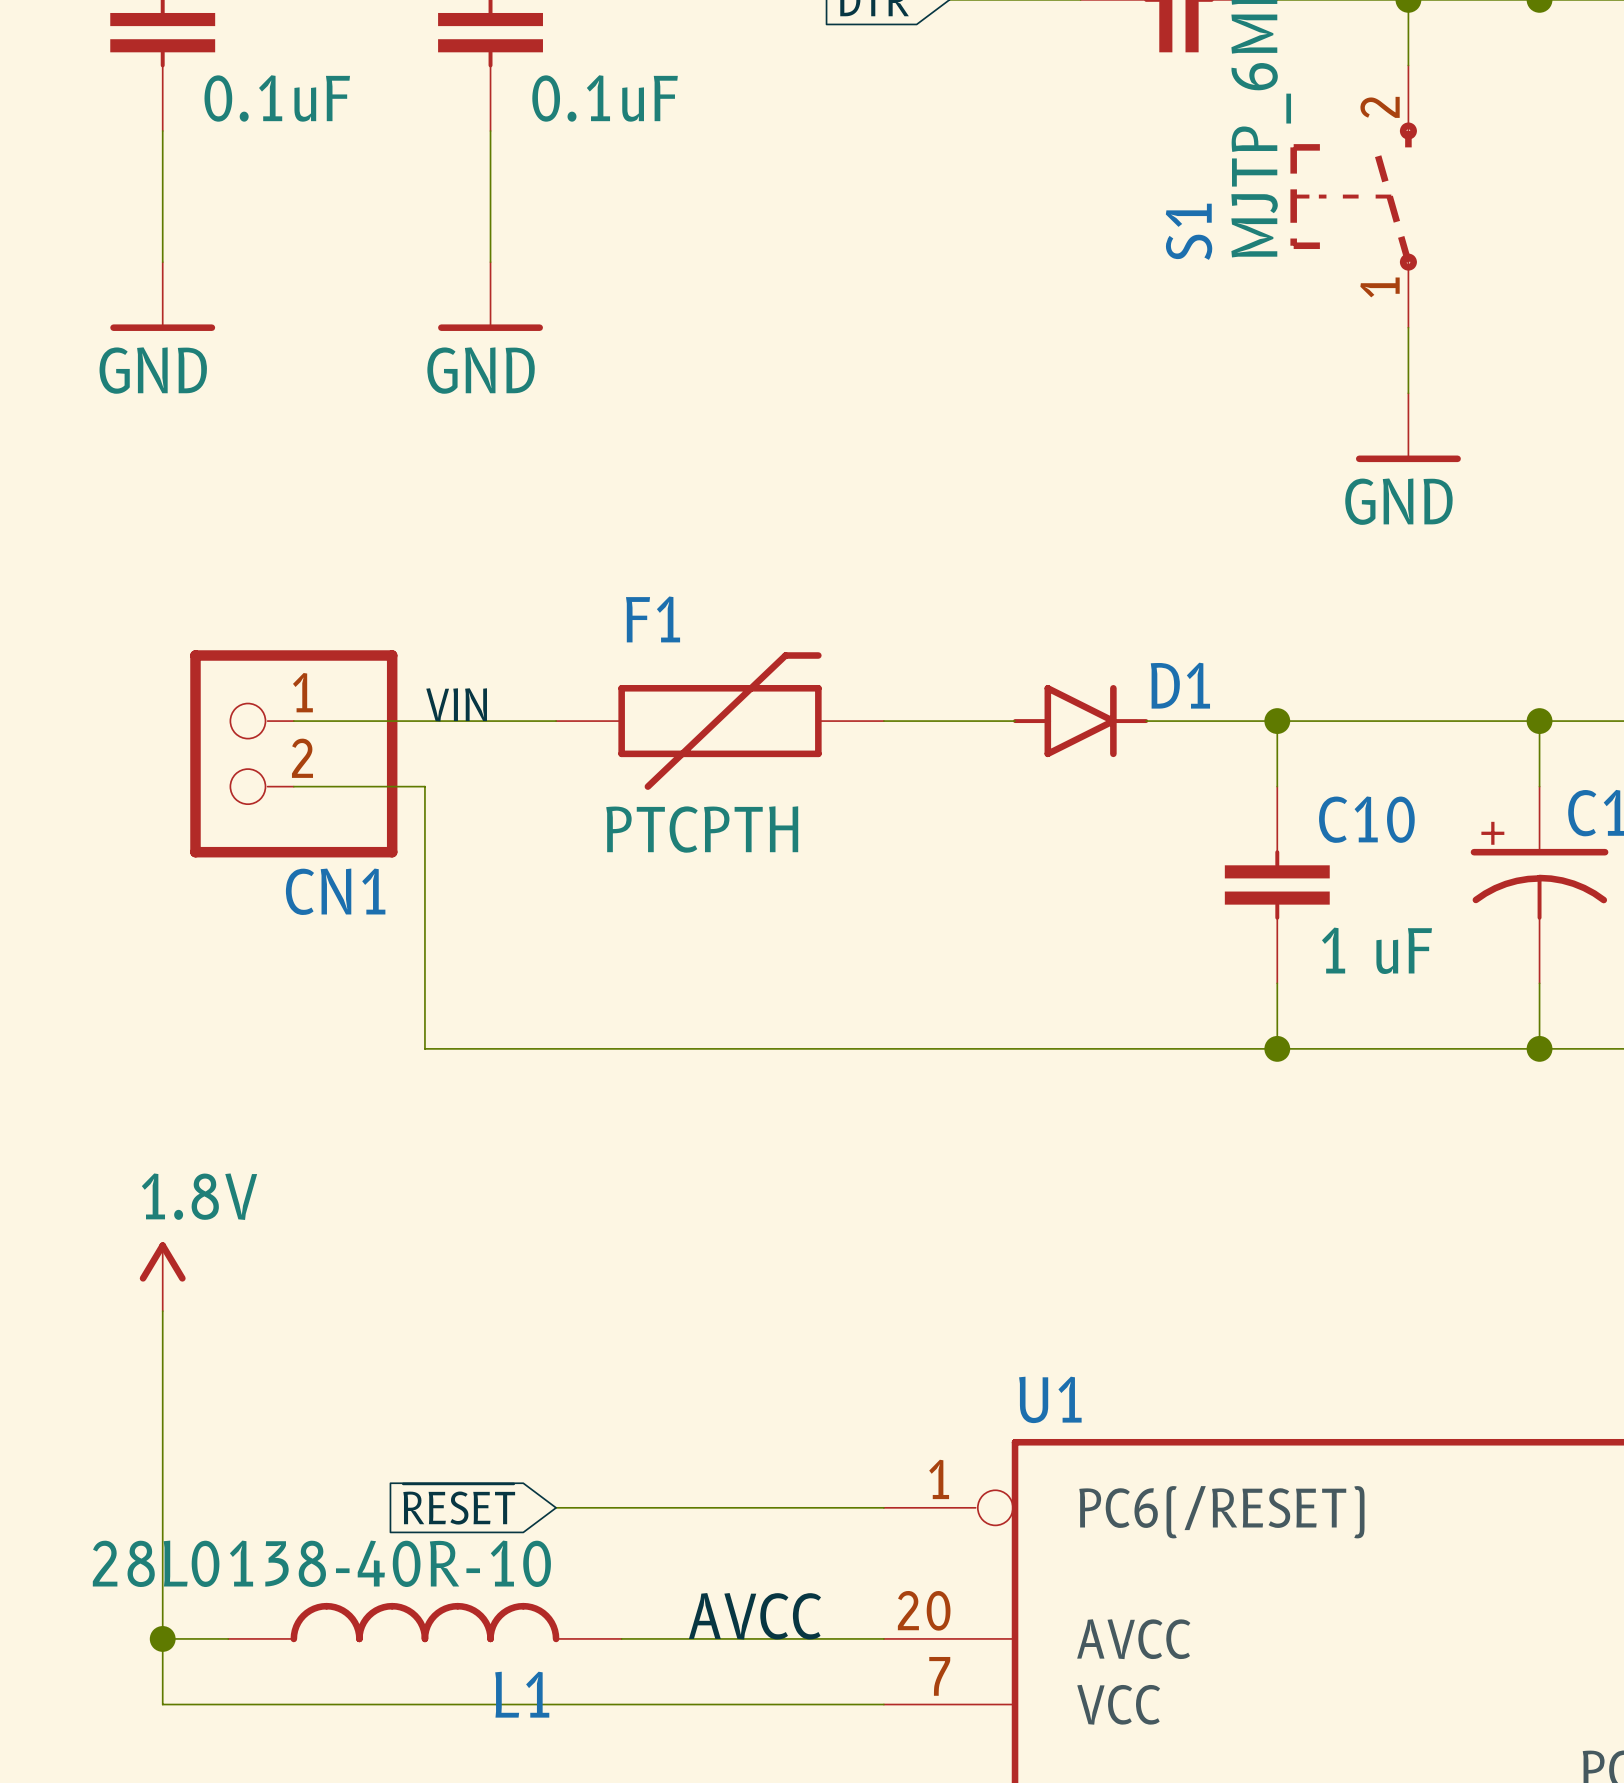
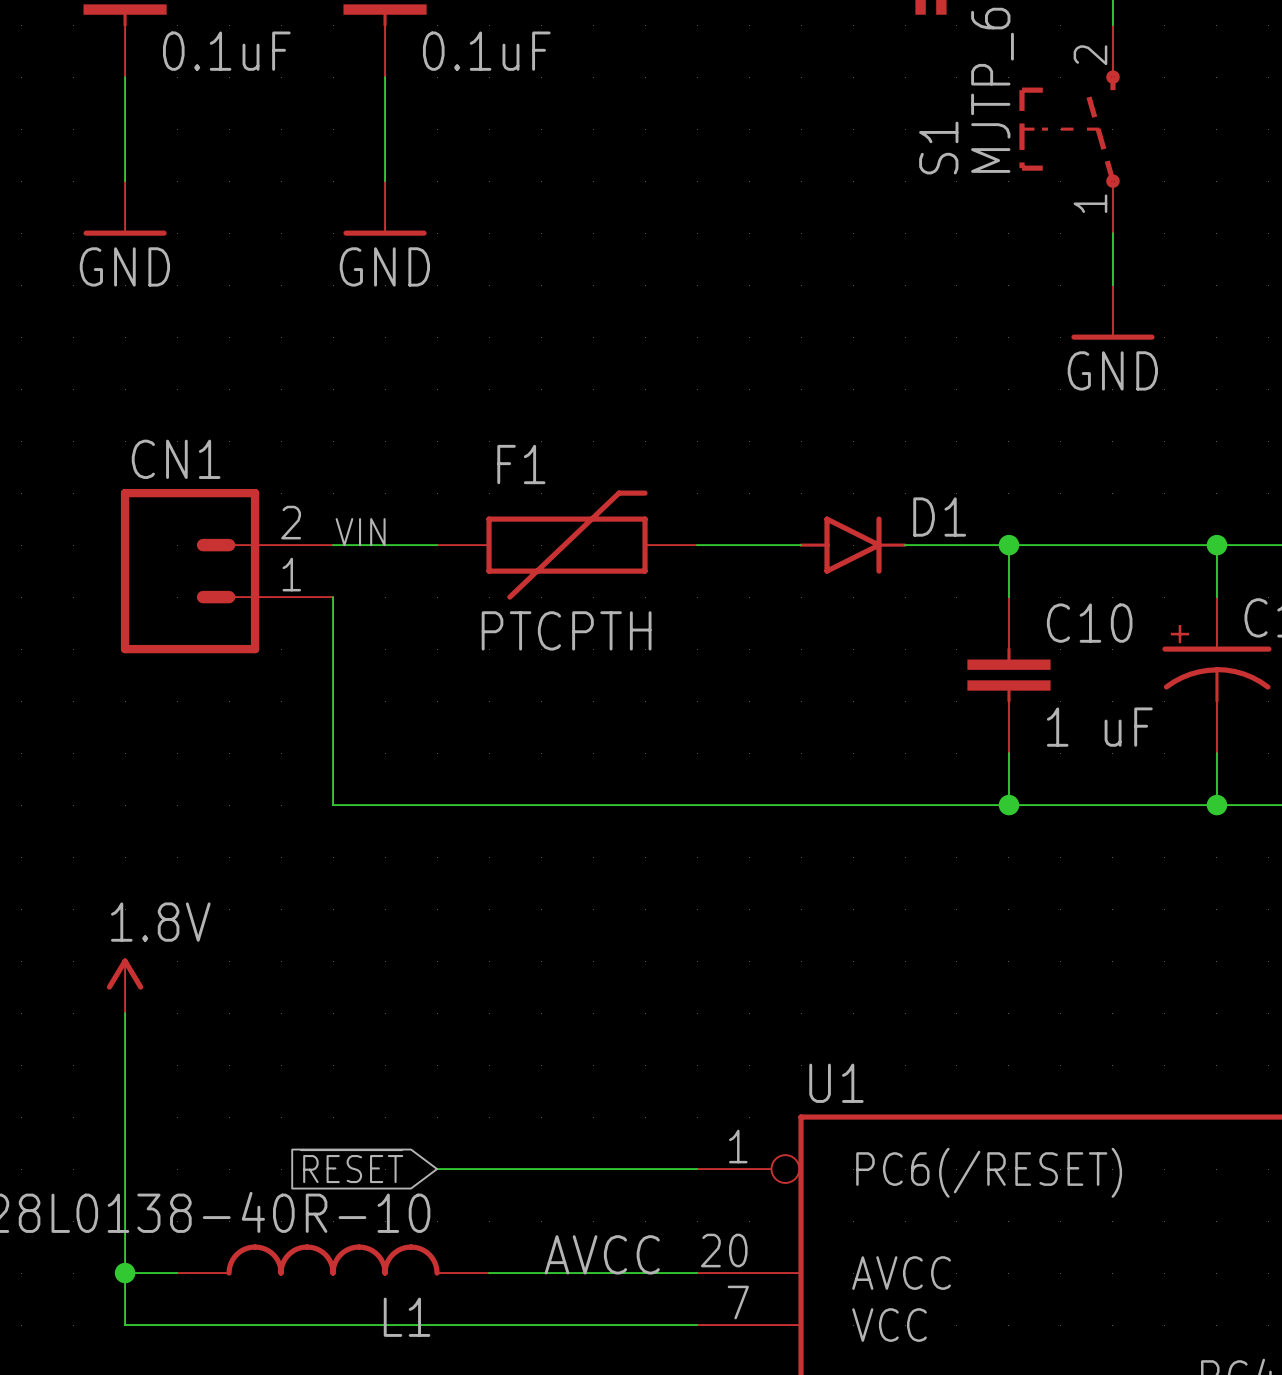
CN1 symbol: [190, 650, 398, 858] -> [120, 488, 334, 654]
CN1 name position: CN1 (335, 891) -> CN1 (176, 459)

